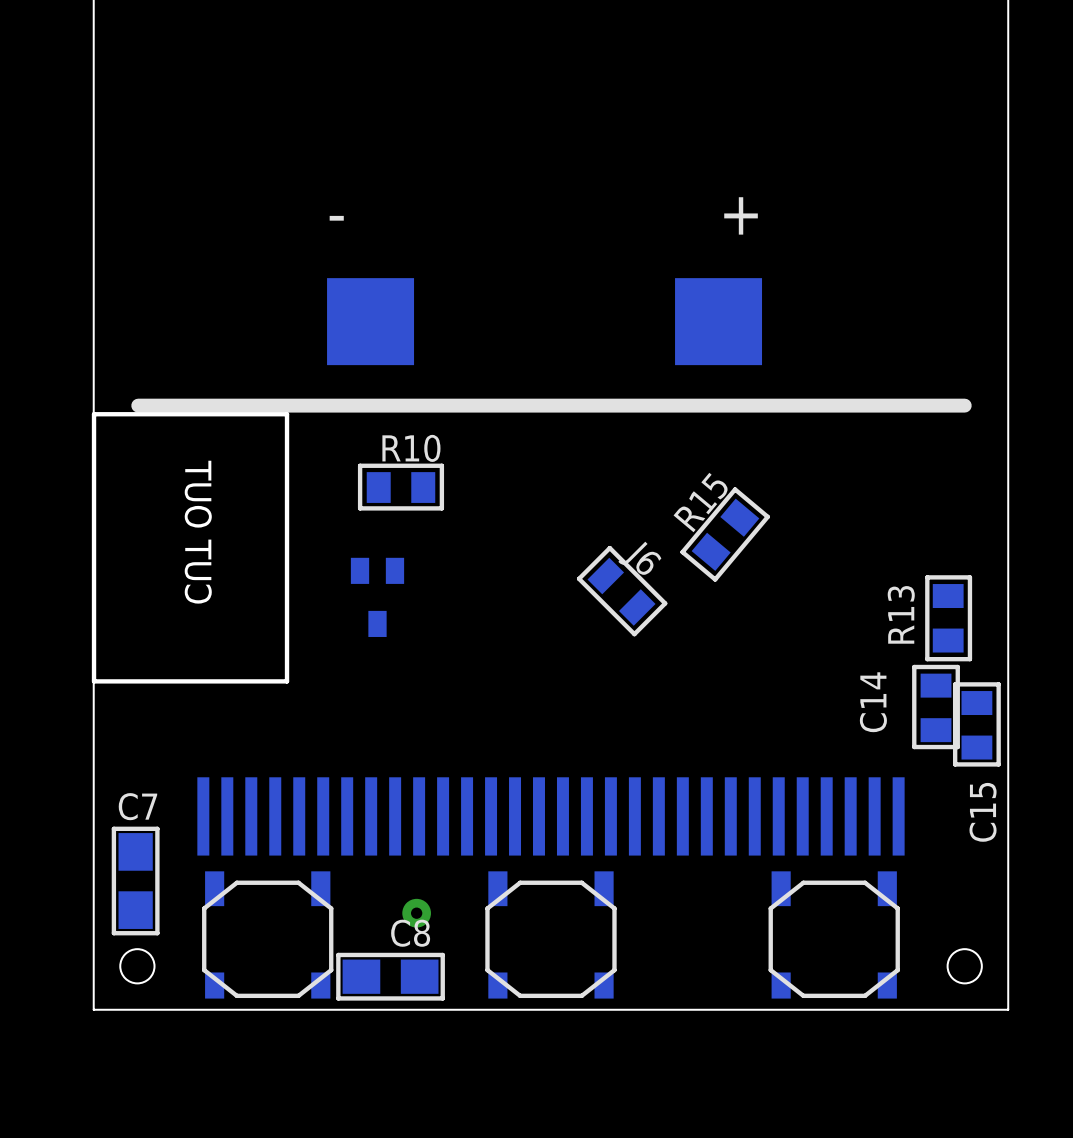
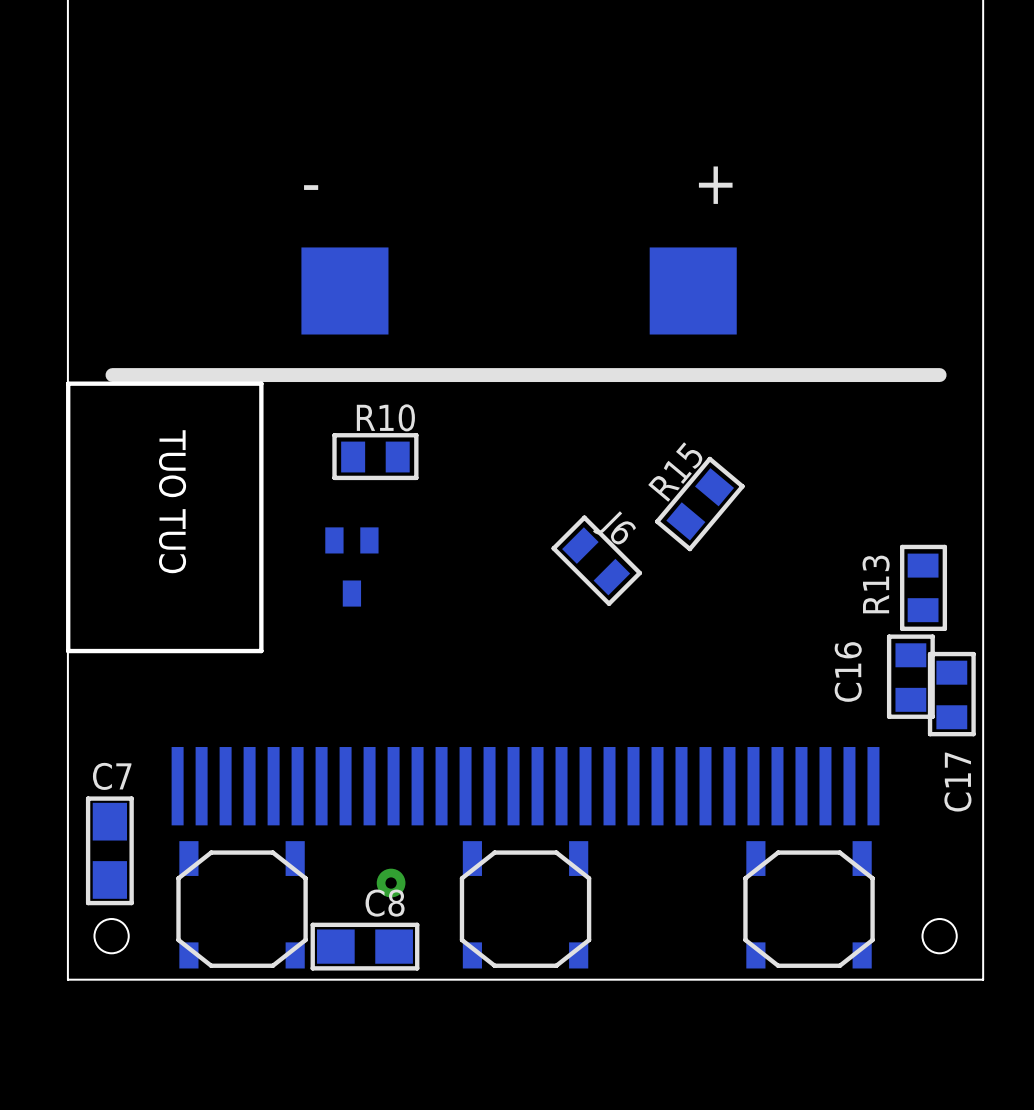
C14 name: C14 (873, 702) -> C16 (848, 672)
C15 name: C15 (983, 812) -> C17 (957, 782)

